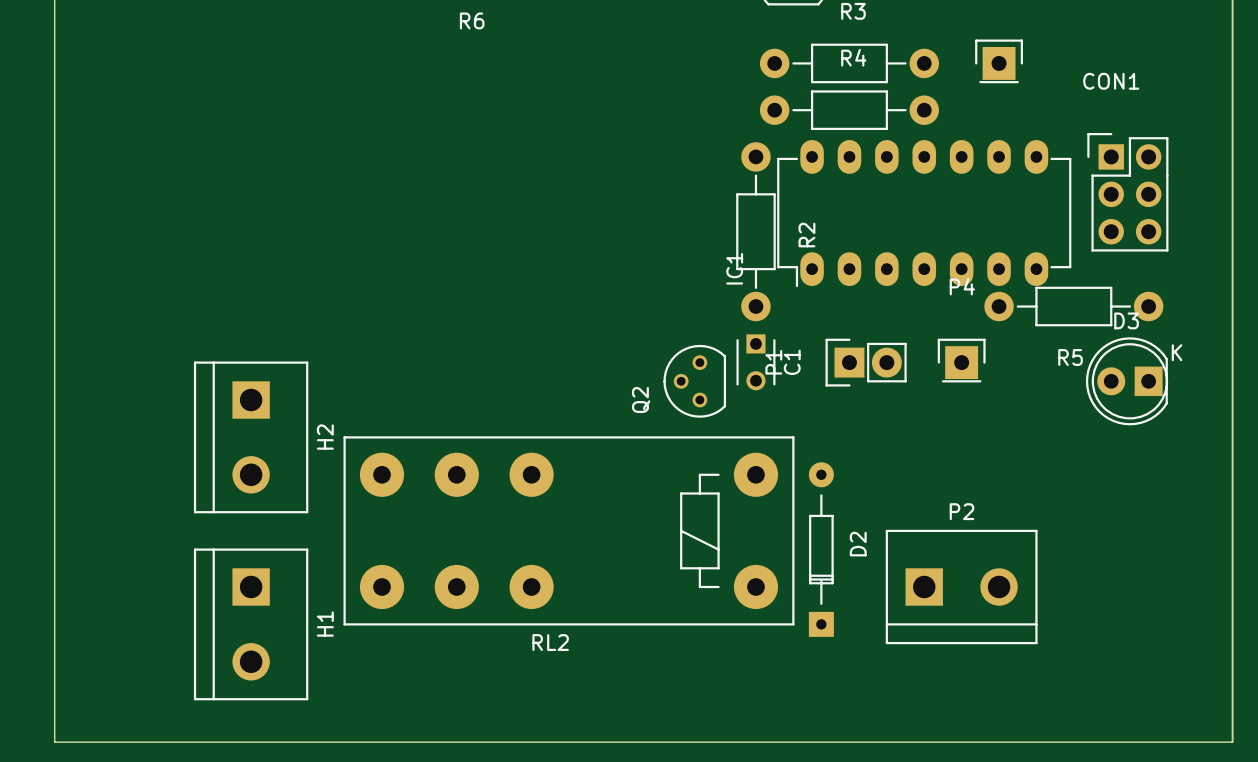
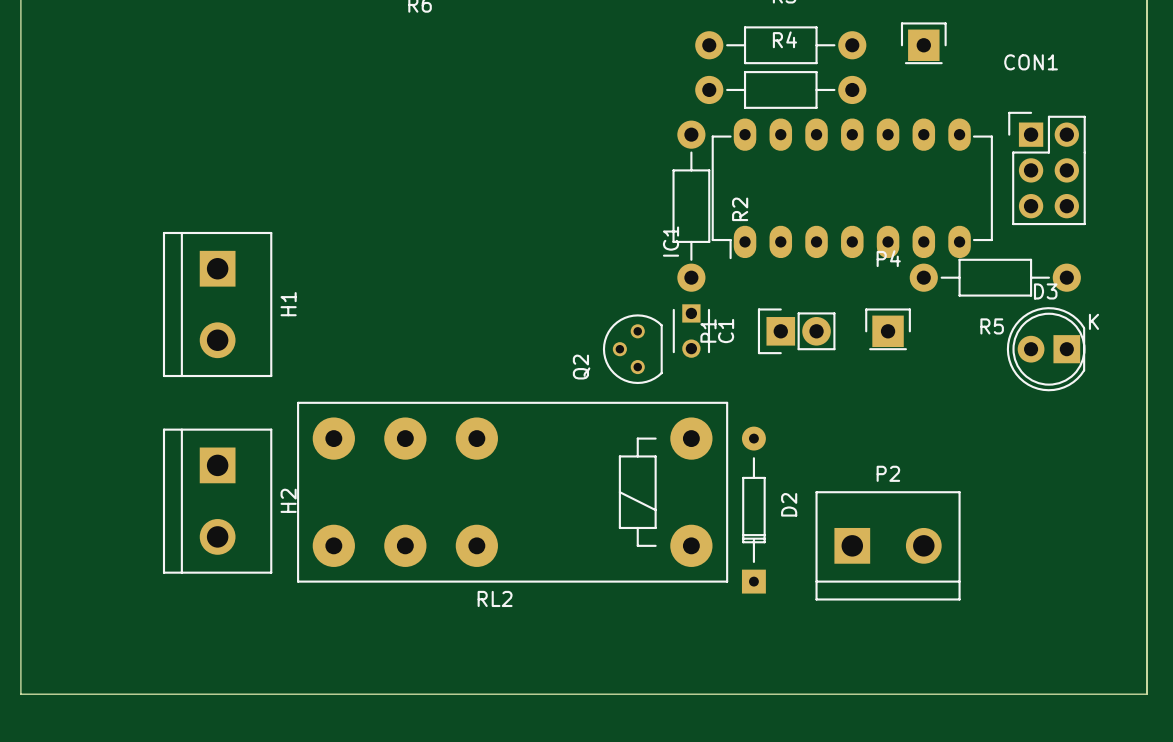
H2 position: (251, 437) -> (217, 501)
H1 position: (251, 624) -> (217, 304)

